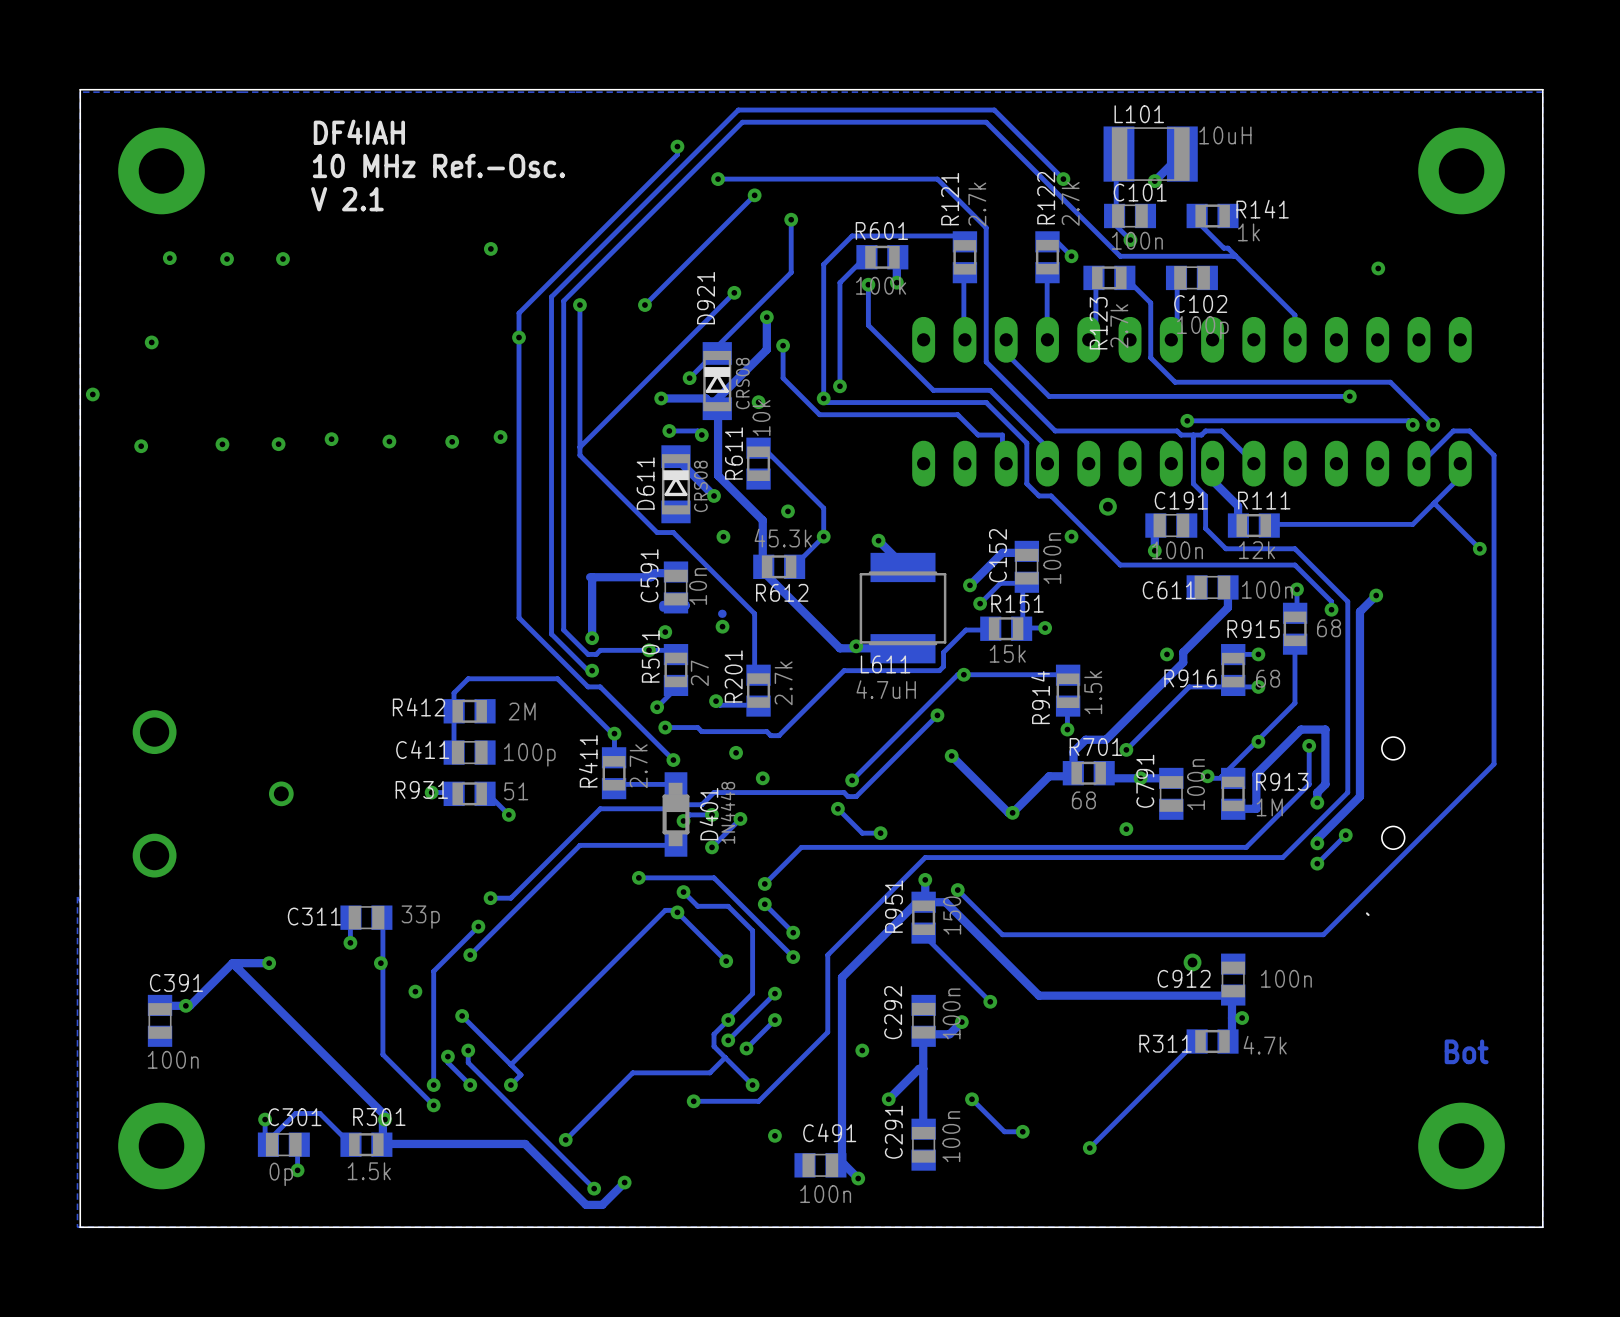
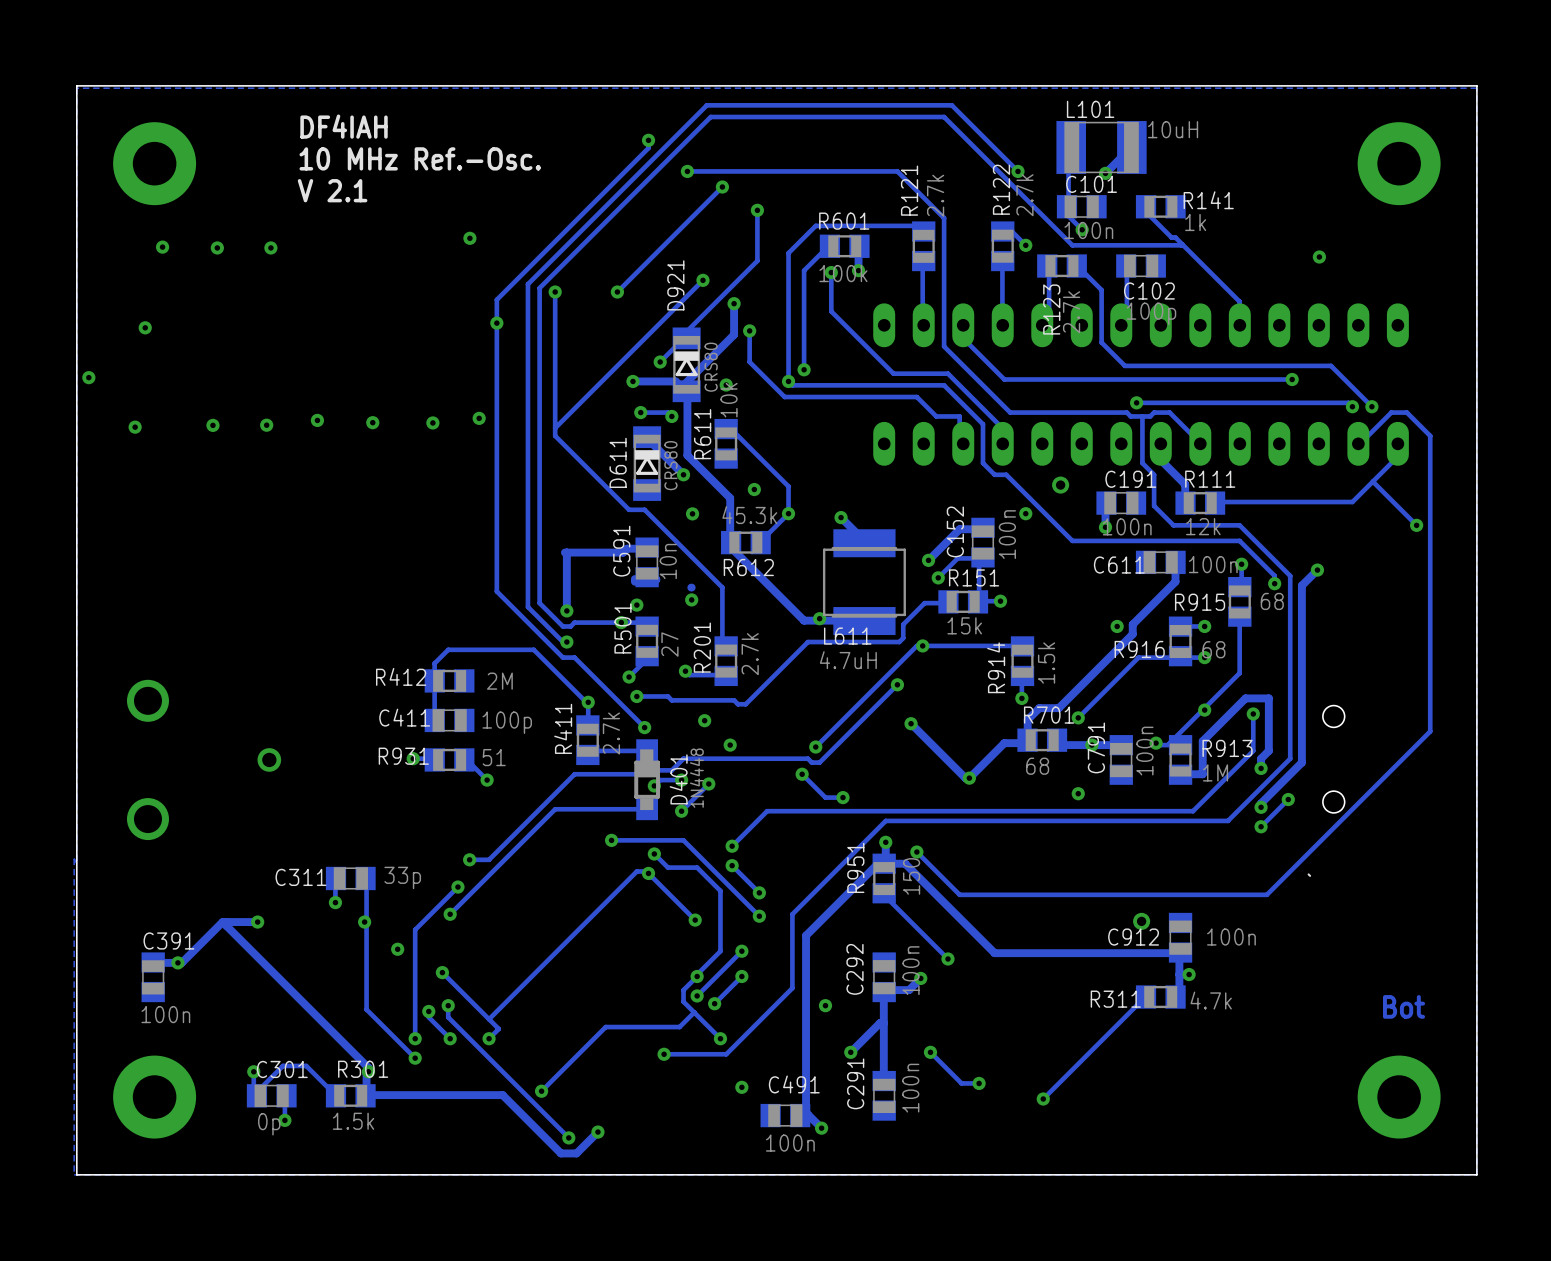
D921 value: CRS08 (742, 383) -> CRS80 (711, 367)
D611 value: CRS08 (700, 486) -> CRS80 (670, 465)

